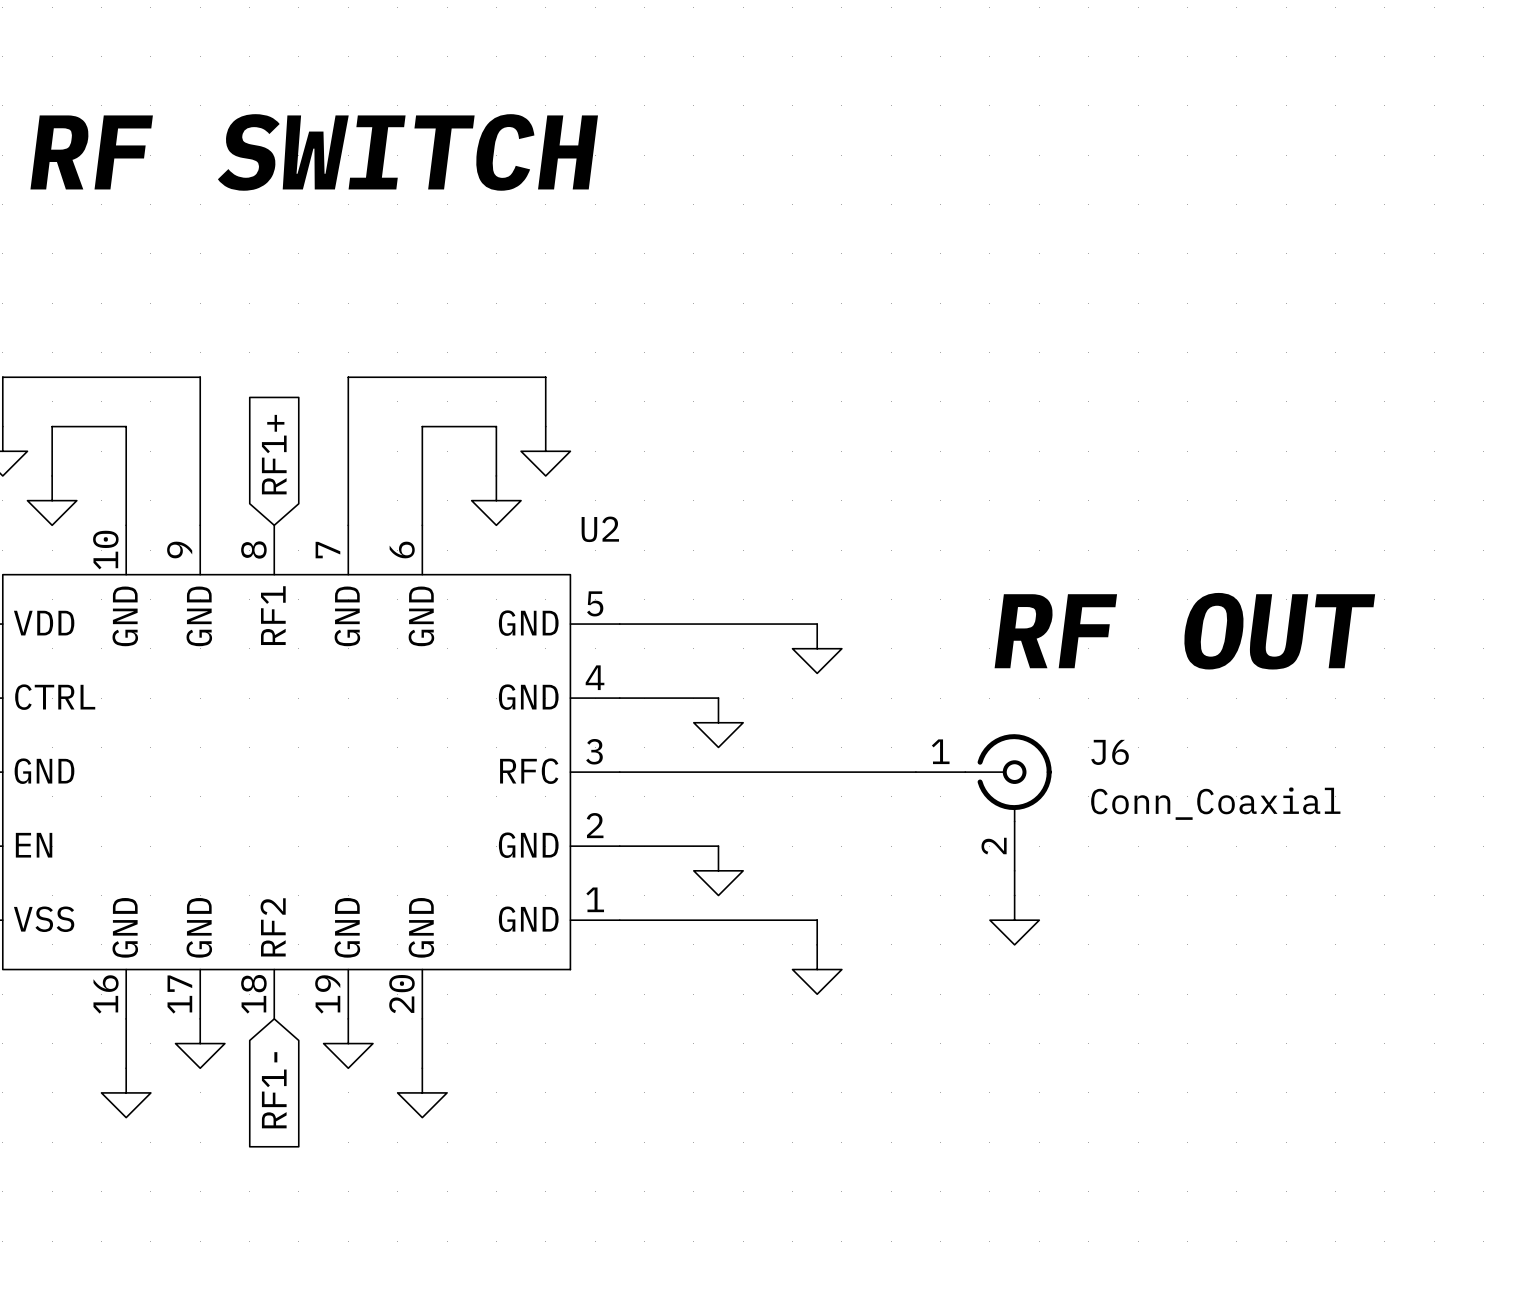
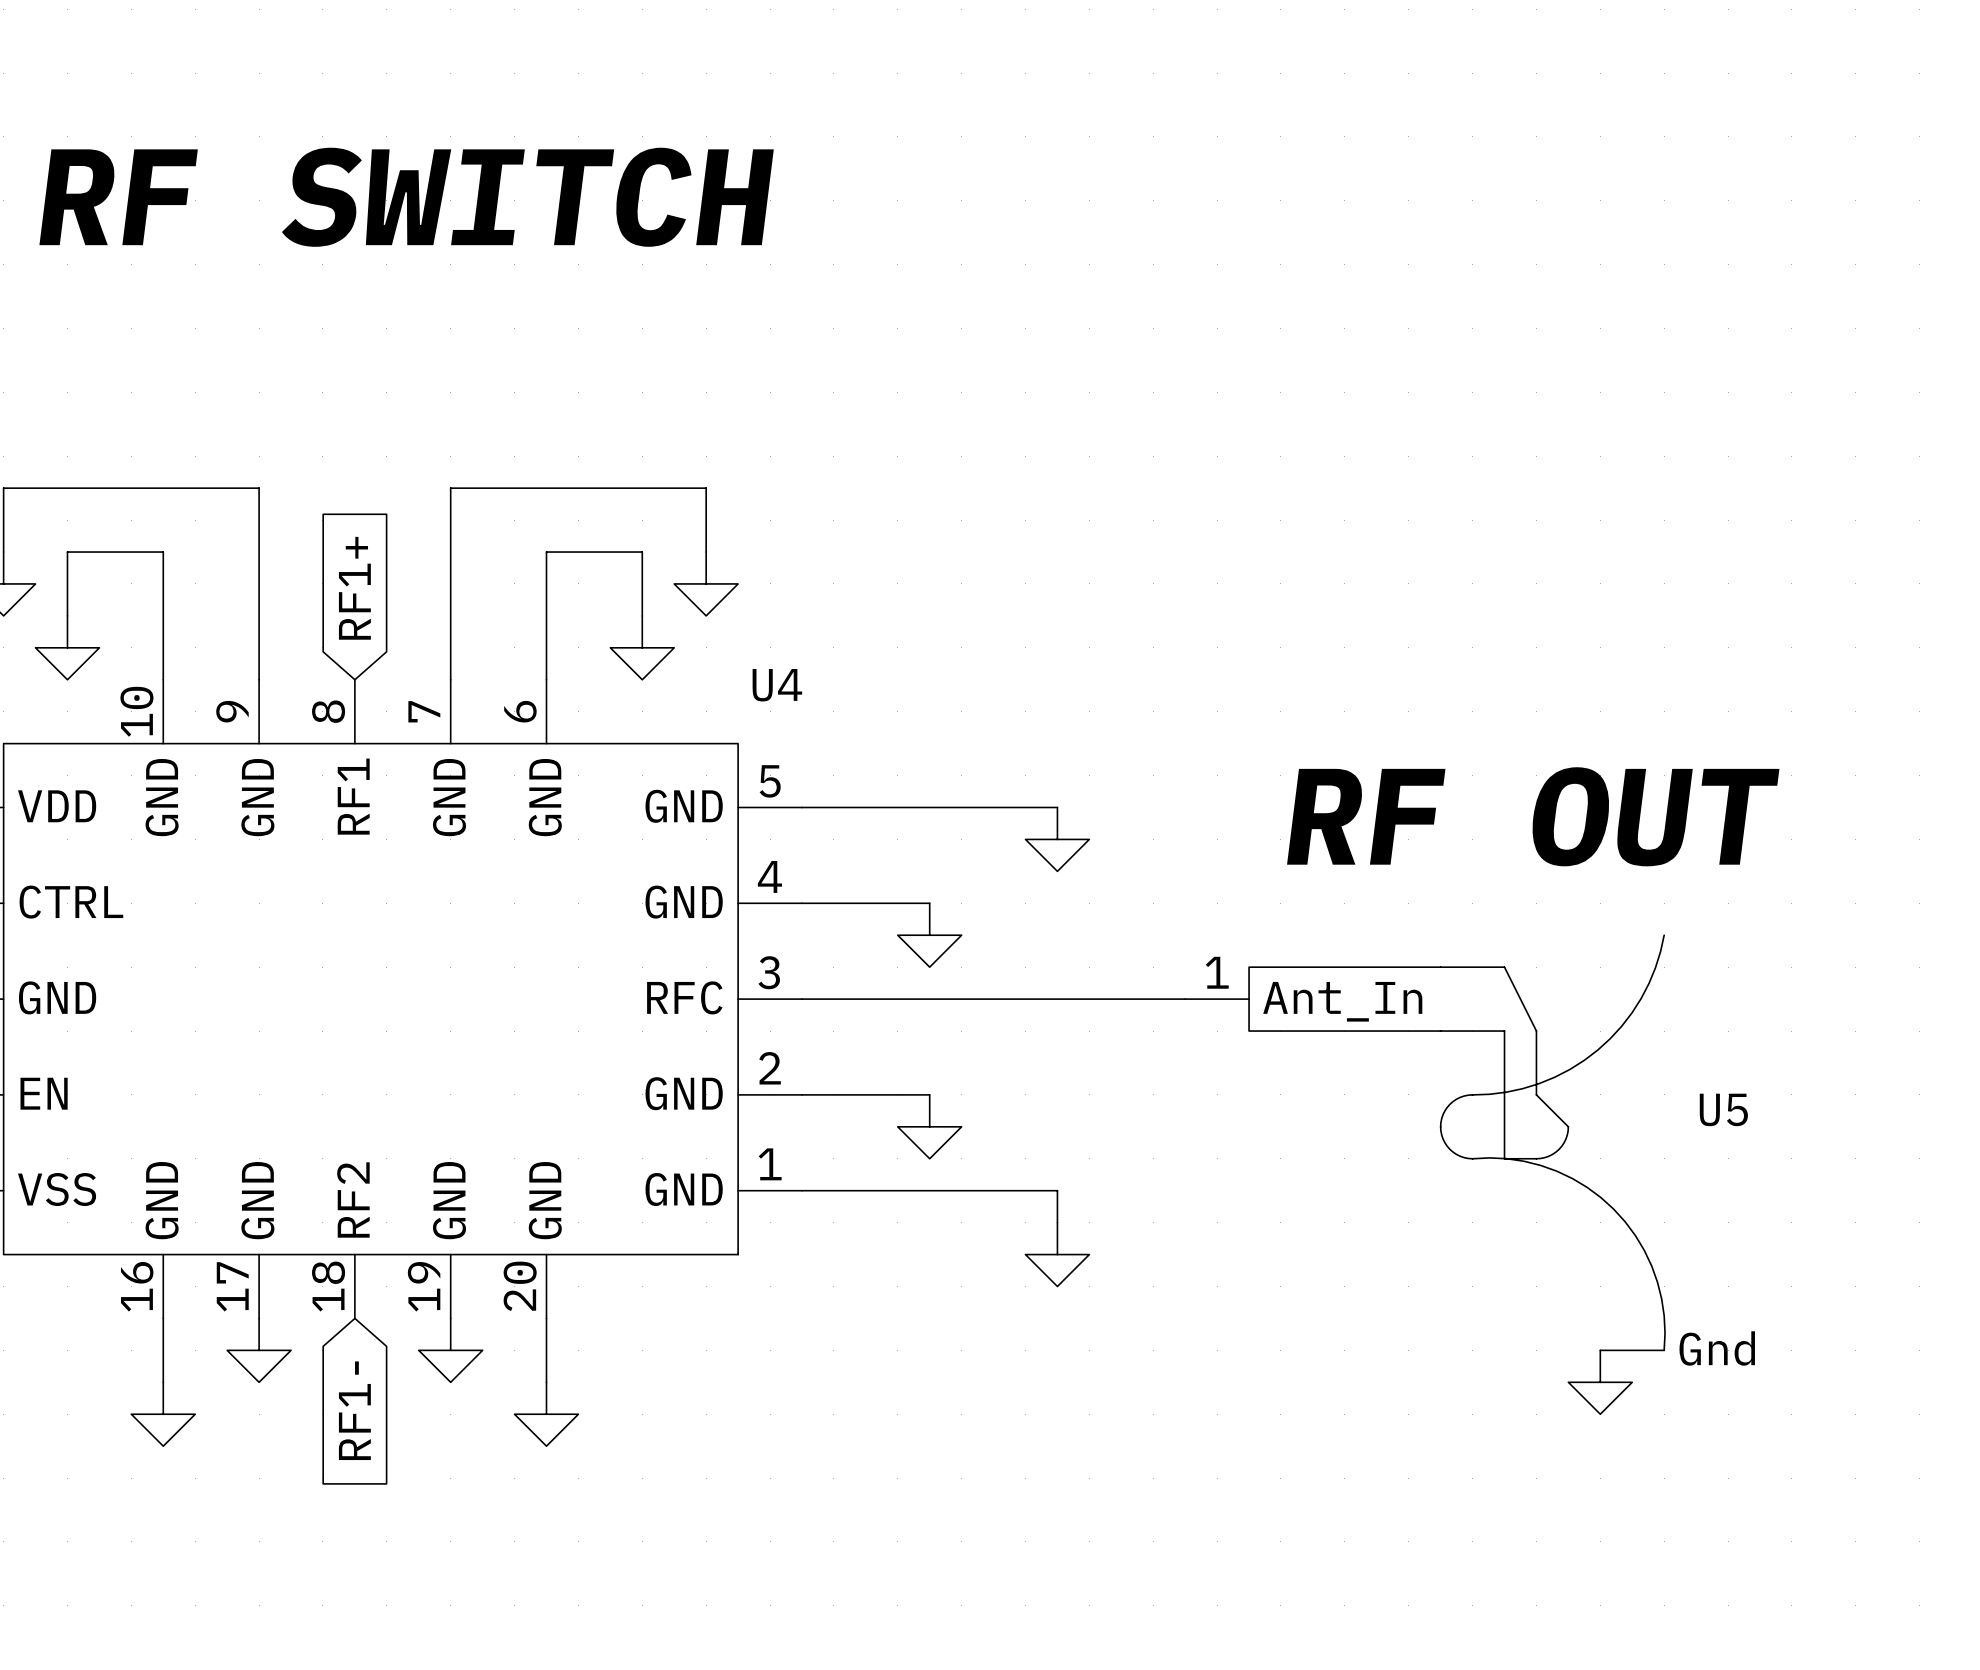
U2 name: U2 (600, 529) -> U4 (777, 685)
J6: Conn_Coaxial (983, 802) -> none
wire: (1014, 870) (1014, 895) -> none
U5: none -> (1425, 1142)
power symbol position: (1014, 920) -> (1600, 1382)

